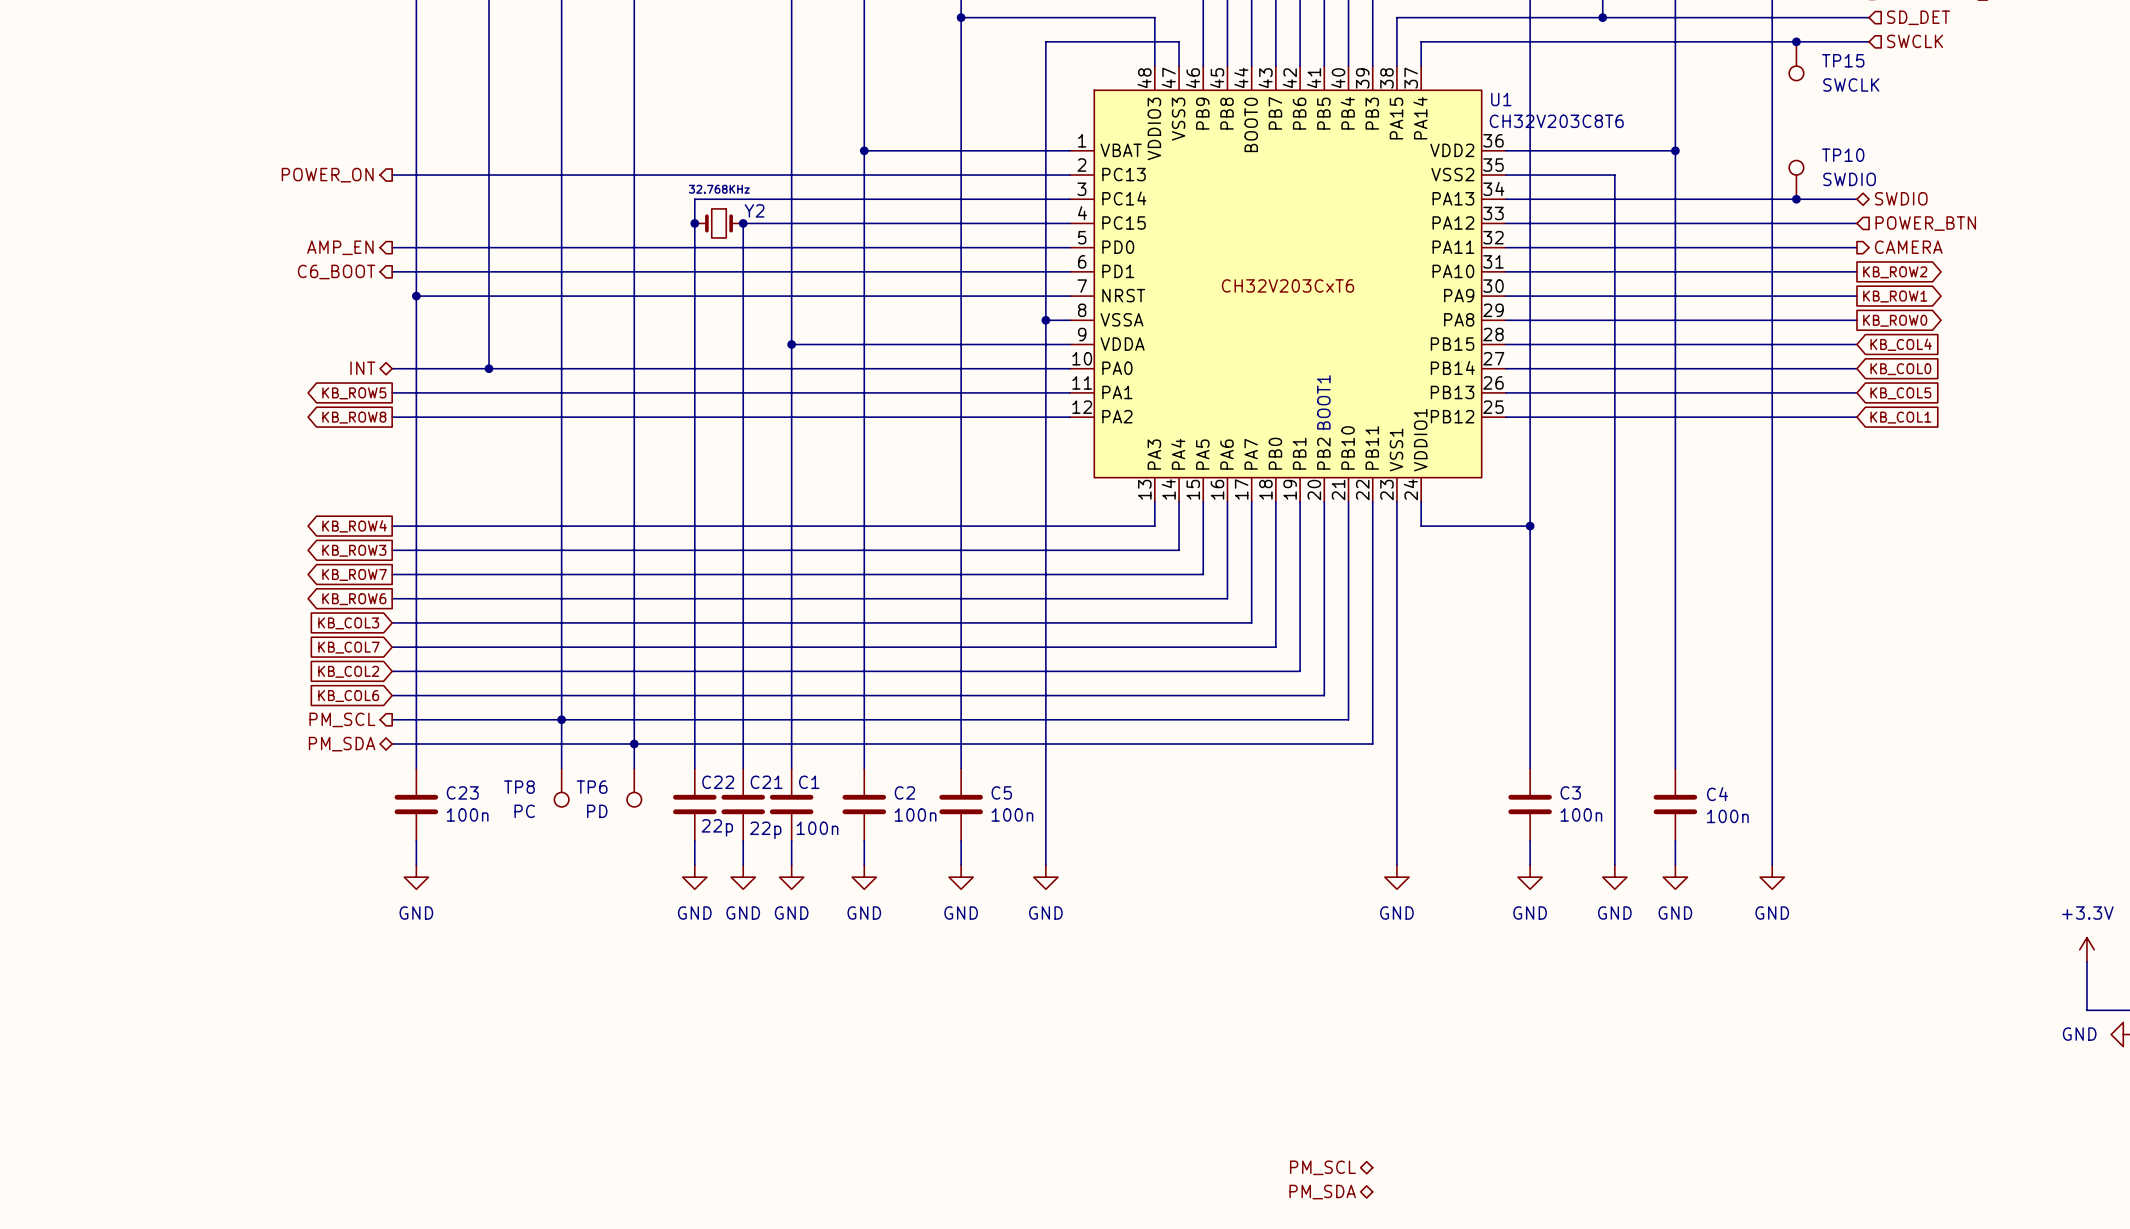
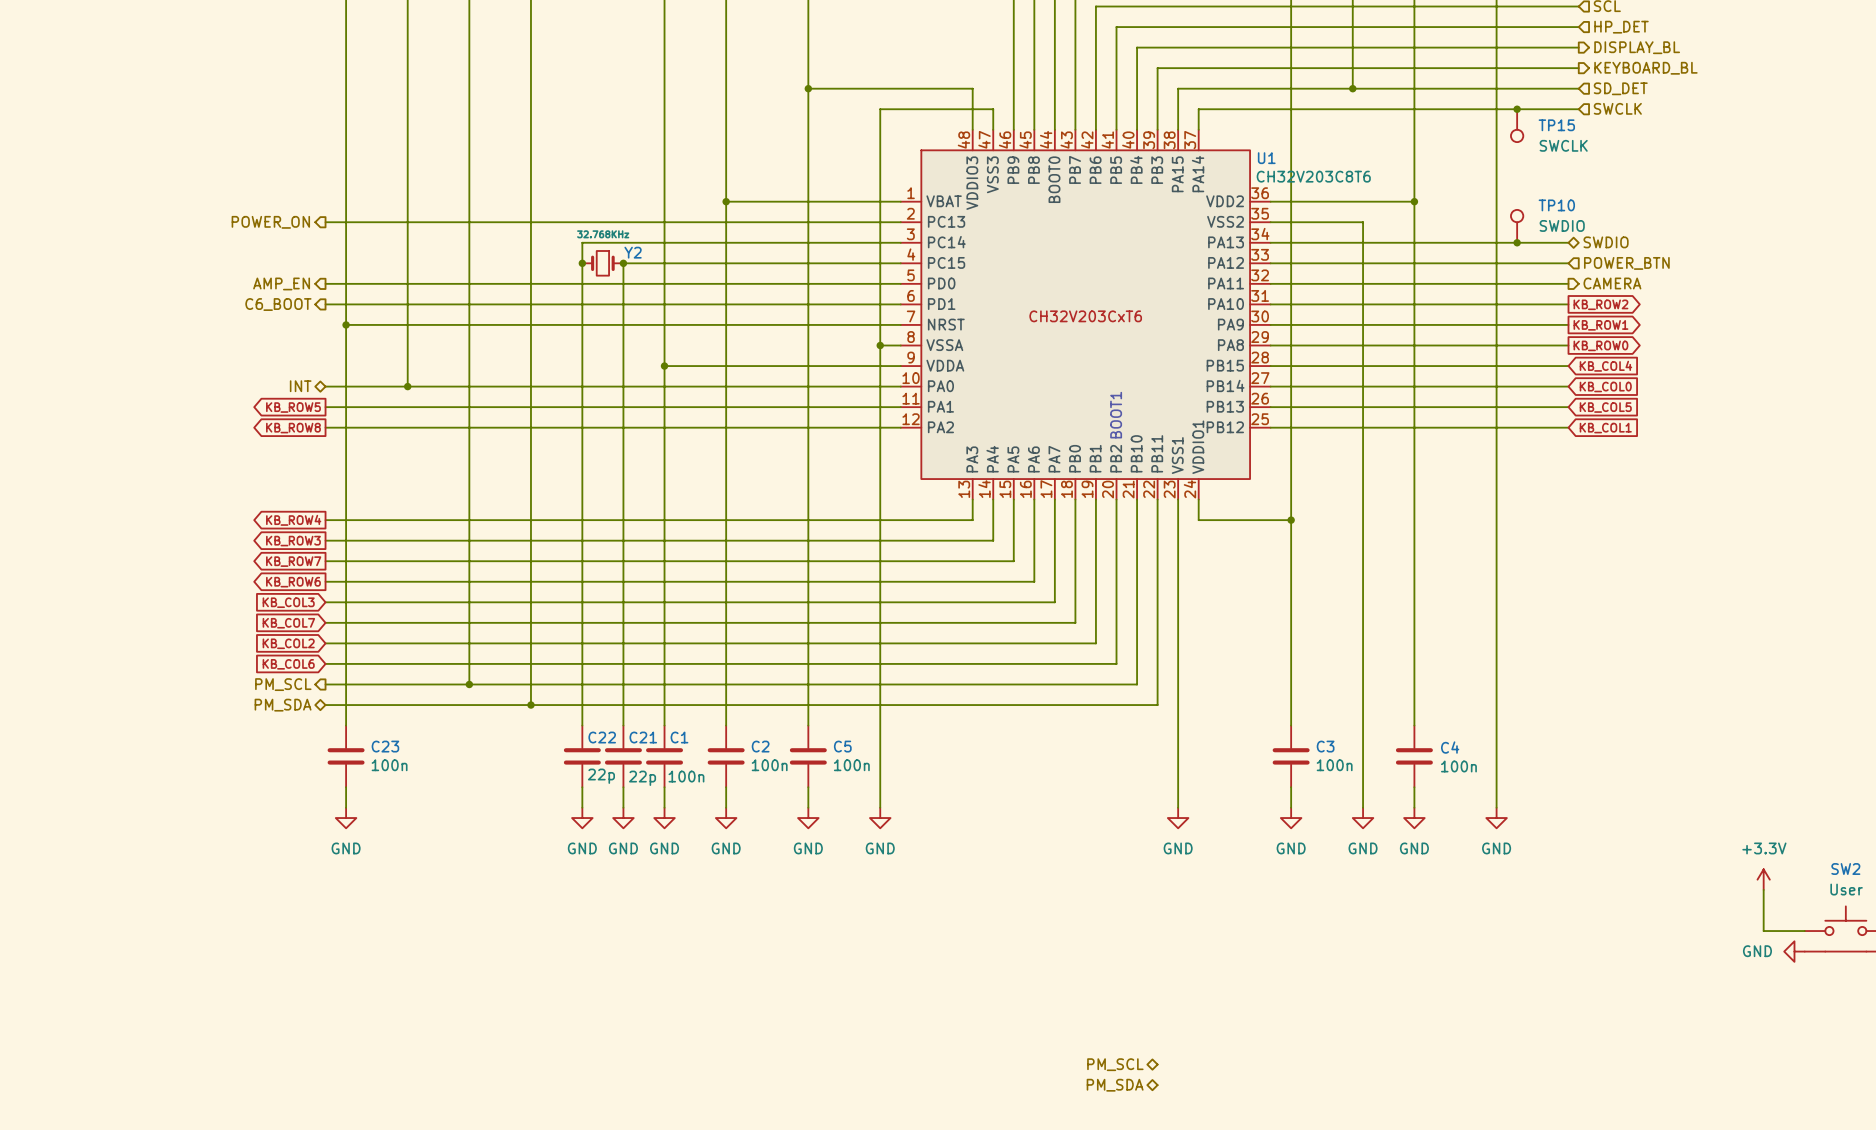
wire: (561, 719) (561, 768) -> none
wire: (634, 743) (634, 768) -> none
TP8: PC (561, 787) -> none
TP6: PD (634, 787) -> none

